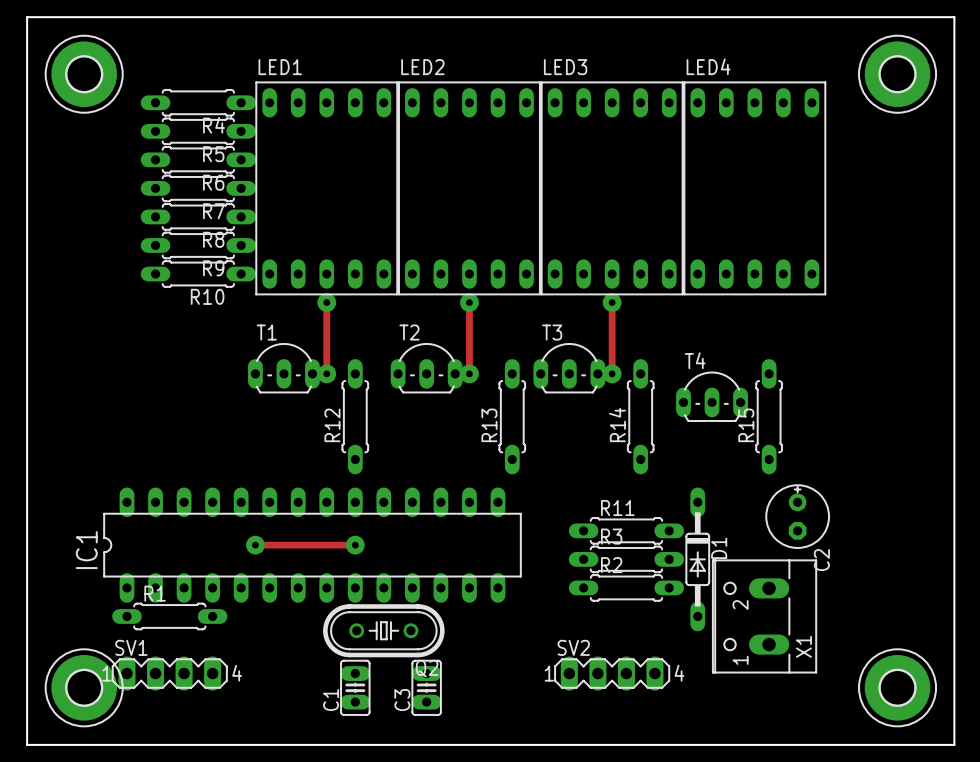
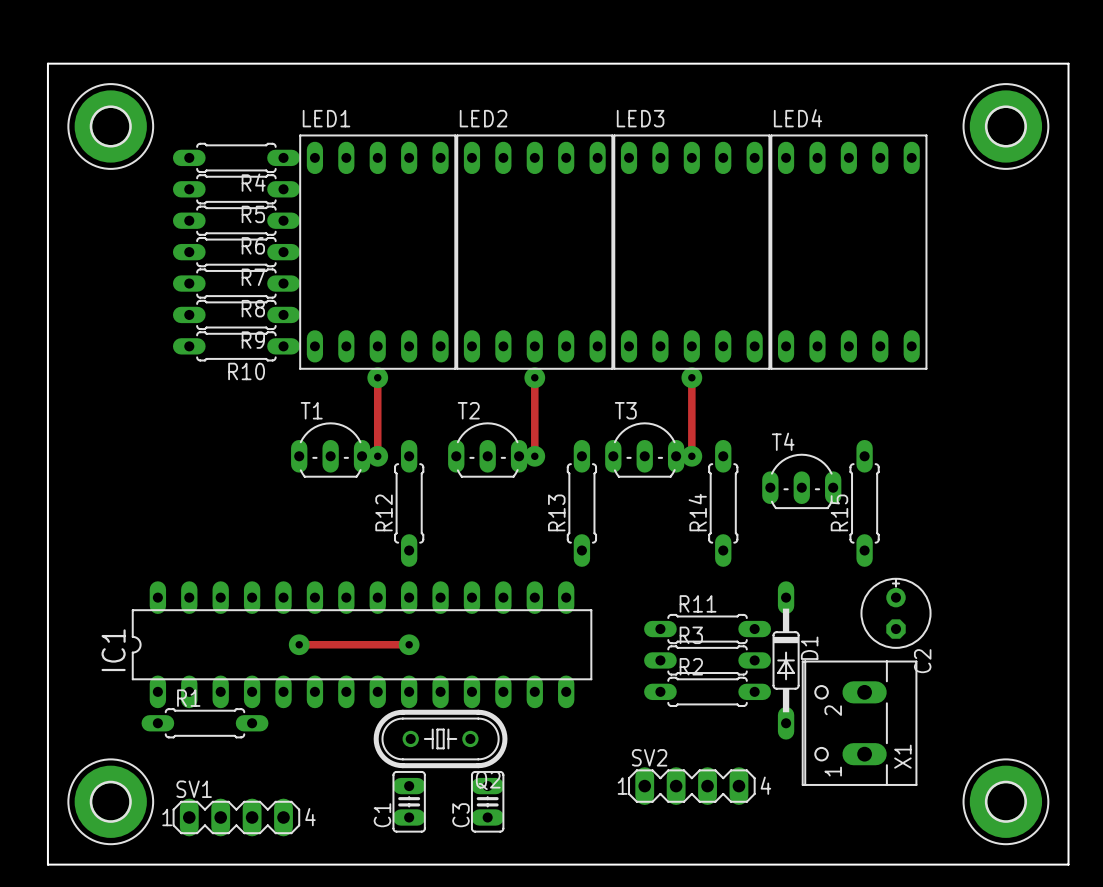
SV1 position: (169, 673) -> (236, 817)

